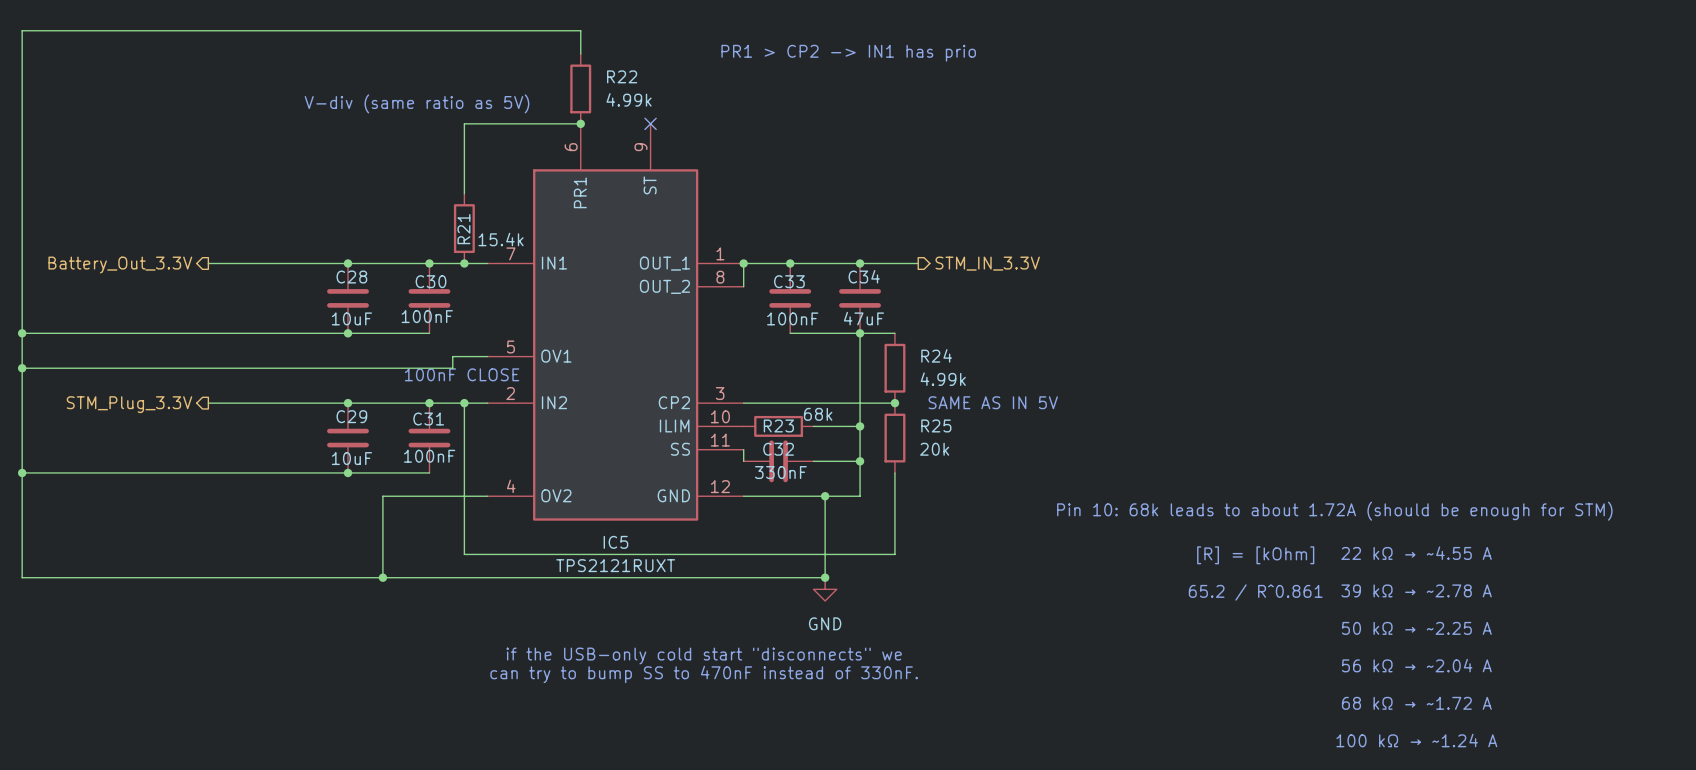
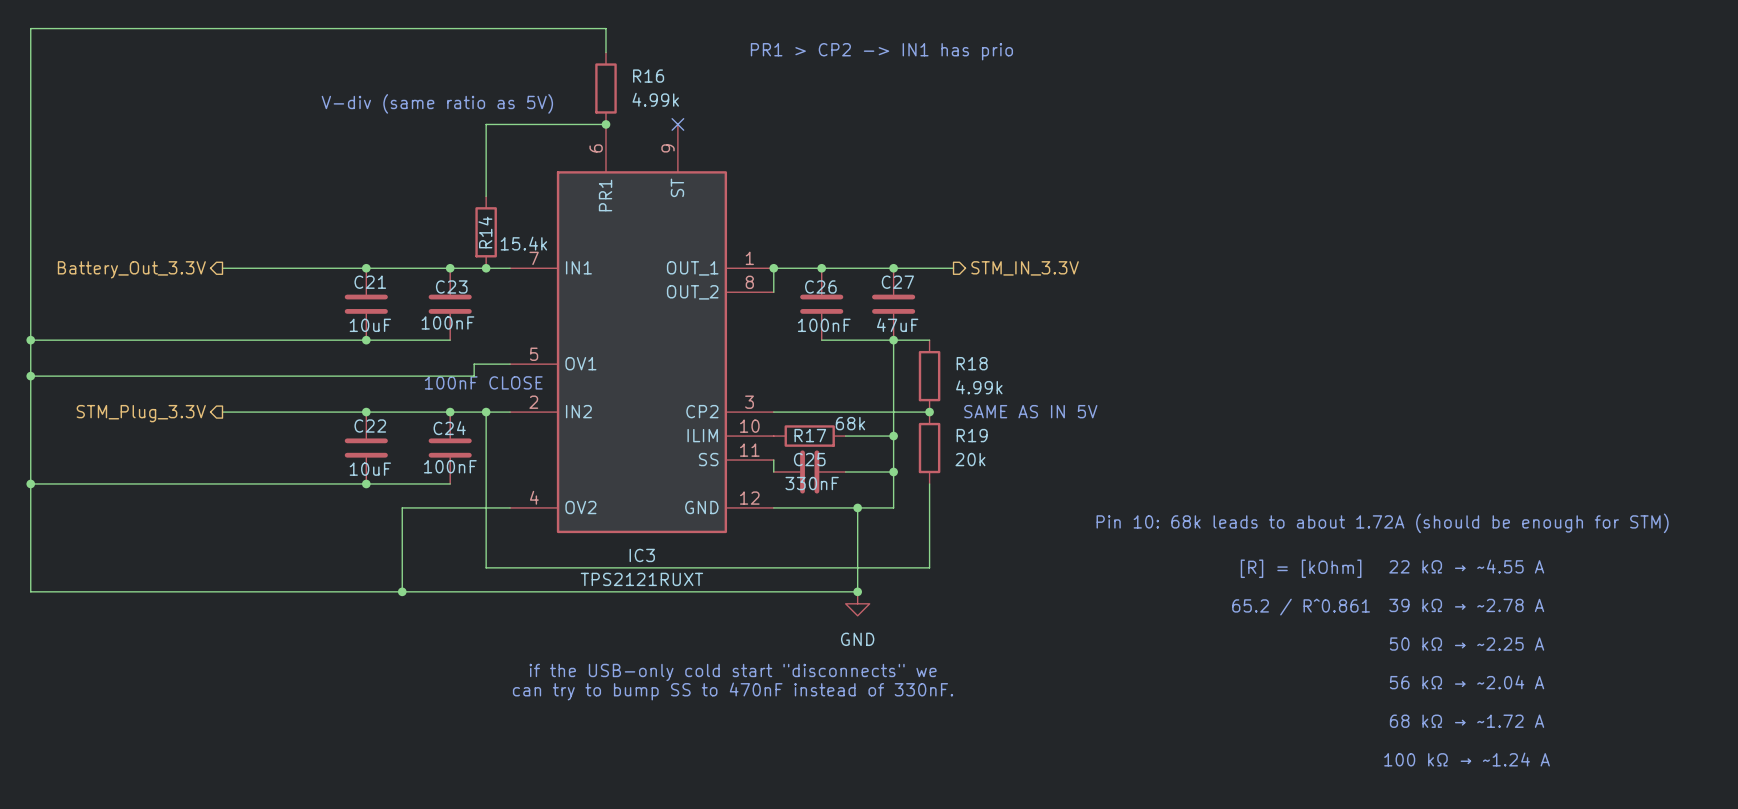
R22 name: R22 (622, 76) -> R16 (648, 76)
R21 name: R21 (463, 229) -> R14 (485, 232)
C34 name: C34 (864, 276) -> C27 (897, 282)
C28 name: C28 (351, 277) -> C21 (370, 282)
C30 name: C30 (430, 281) -> C23 (451, 286)
C33 name: C33 (789, 281) -> C26 (820, 286)
R24 name: R24 (936, 355) -> R18 (972, 363)
C29 name: C29 (351, 416) -> C22 (370, 426)
C31 name: C31 (428, 419) -> C24 (449, 428)
R23 name: R23 (778, 425) -> R17 (810, 435)
R25 name: R25 (936, 425) -> R19 (972, 435)
C32 name: C32 (778, 449) -> C25 (809, 459)
IC5 name: IC5 (615, 542) -> IC3 (642, 555)

